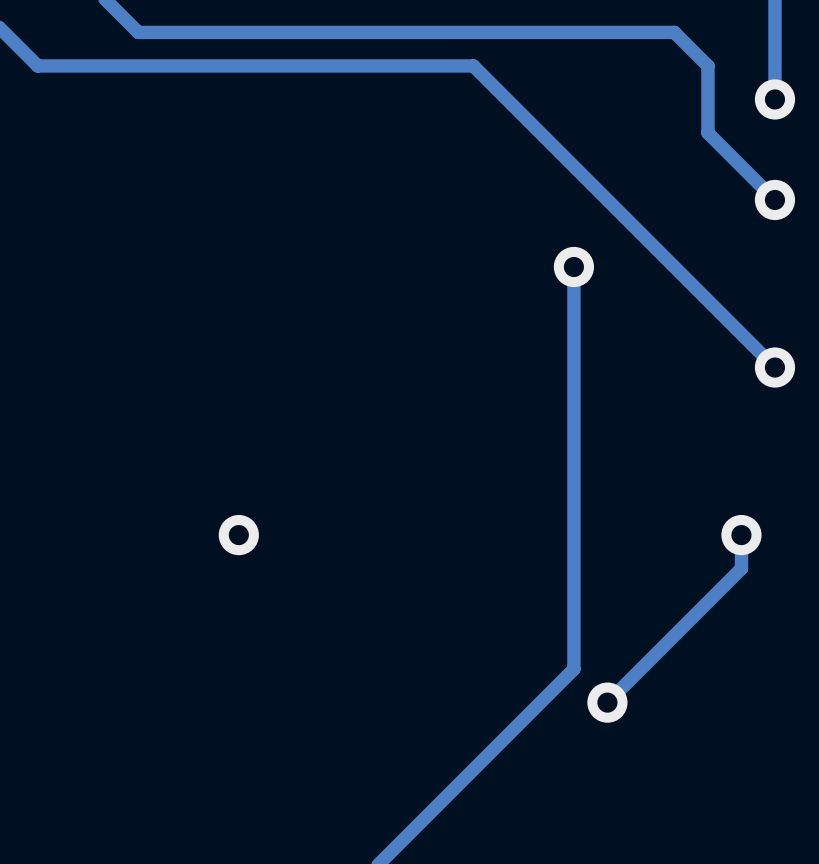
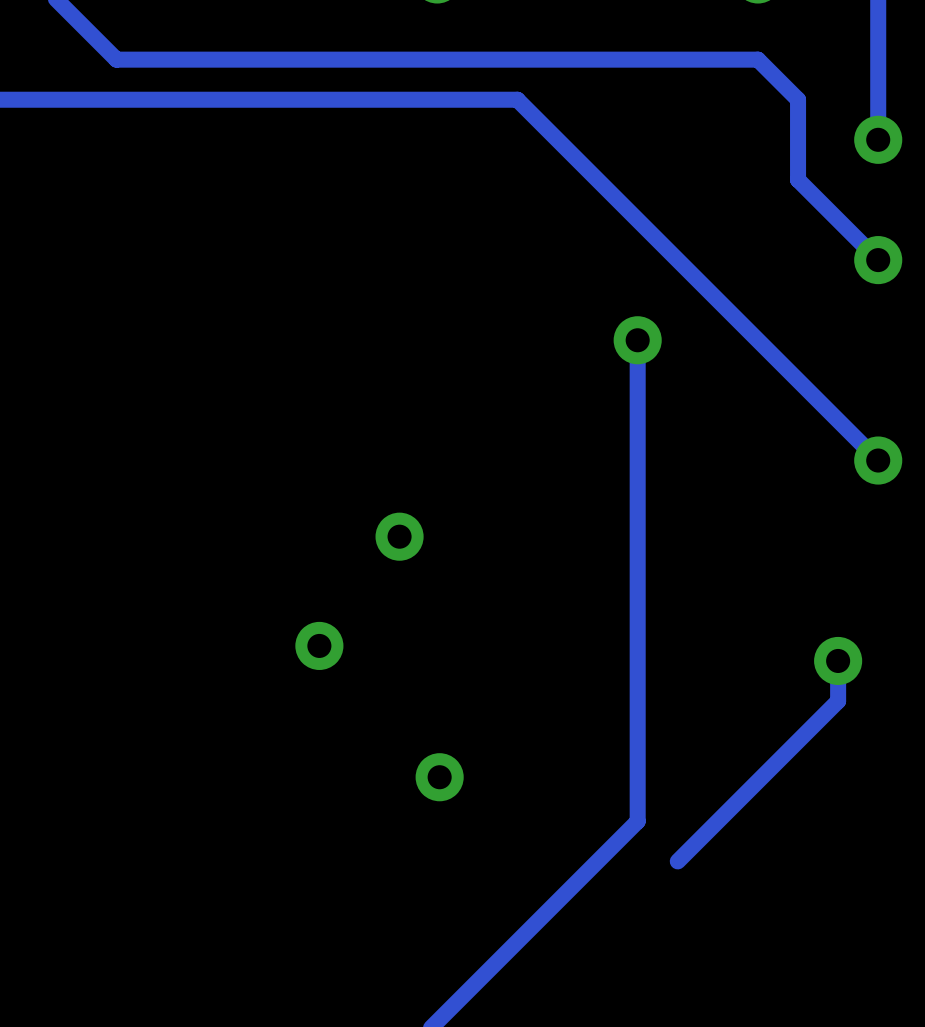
via: none -> (399, 536)
via position: (238, 535) -> (319, 645)
via: none -> (439, 777)
via: (607, 702) -> none

